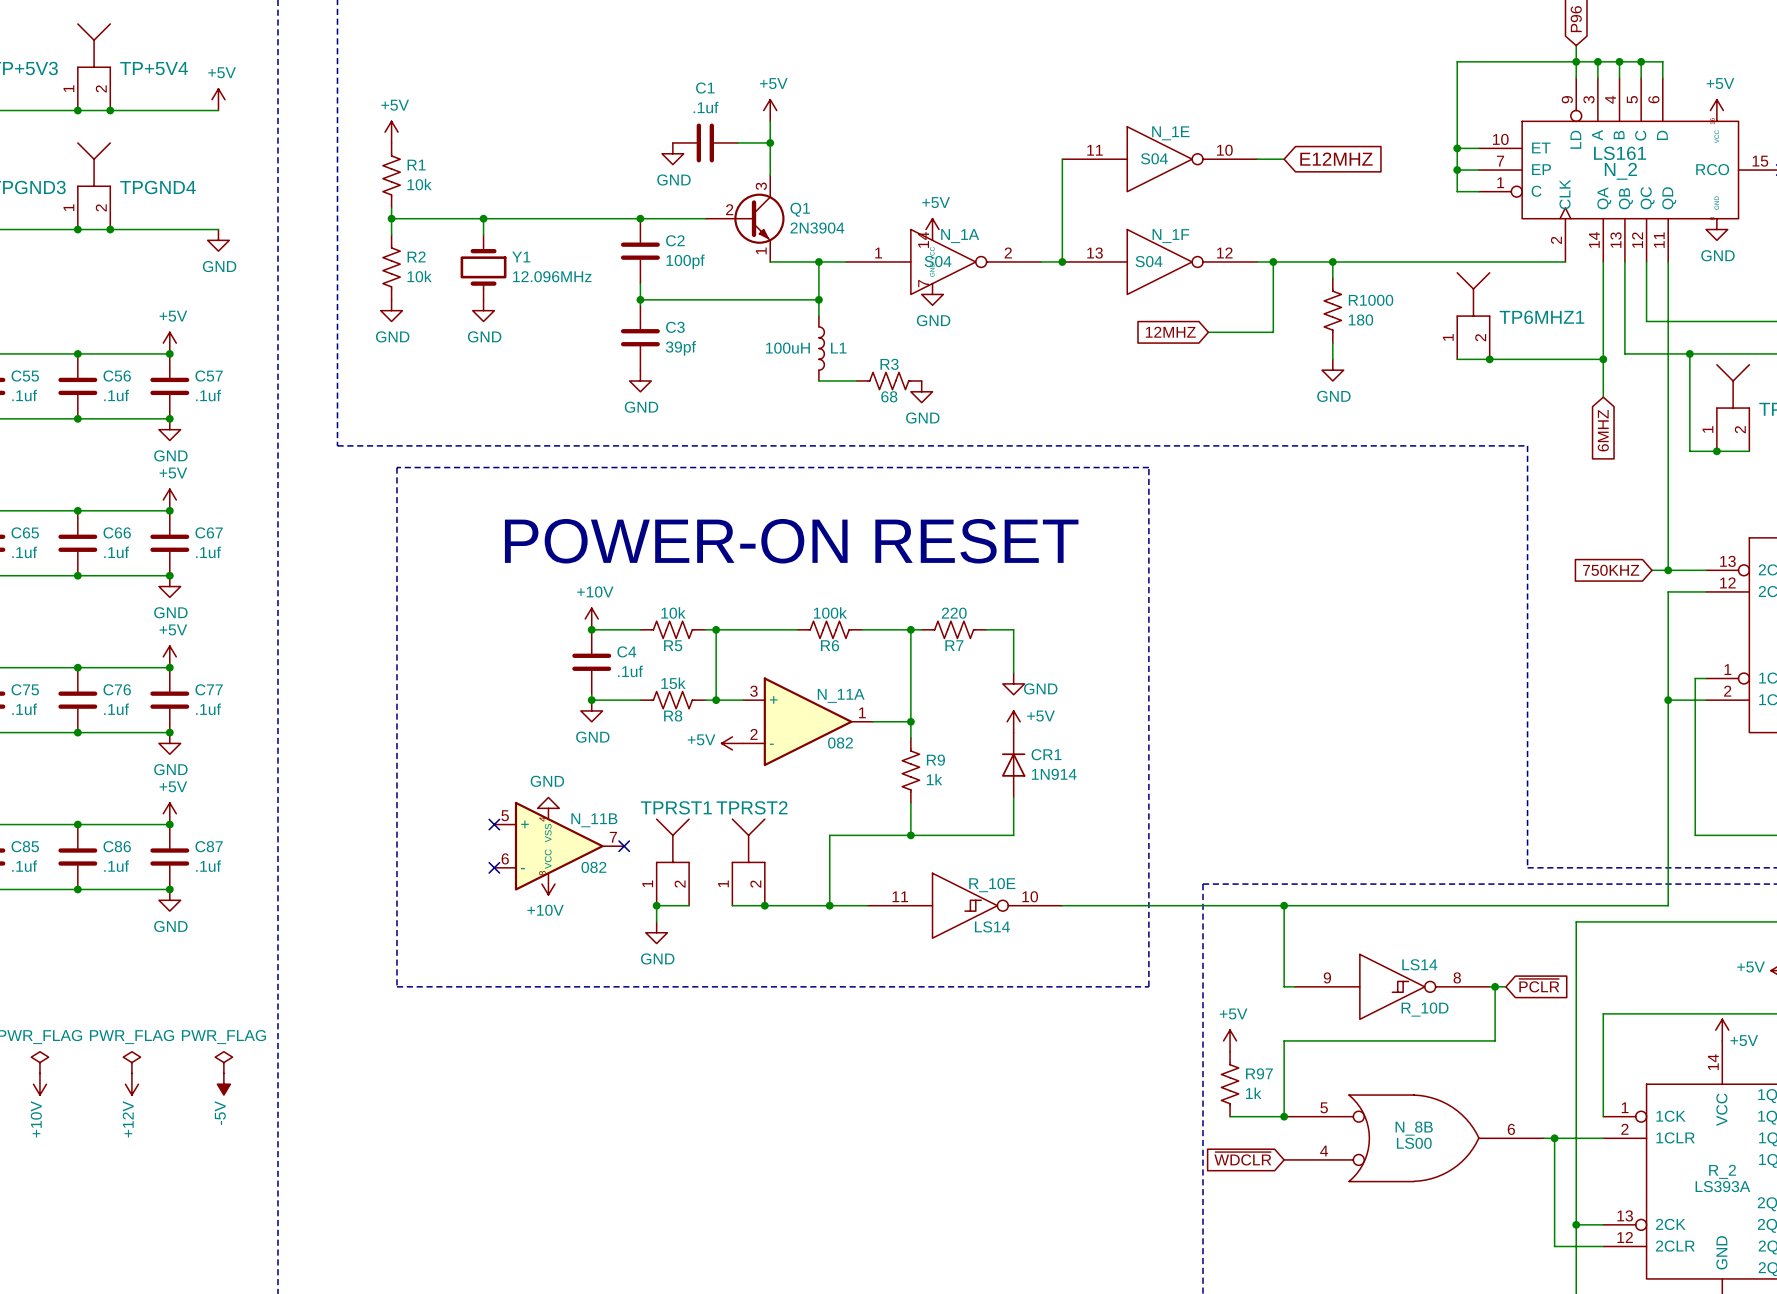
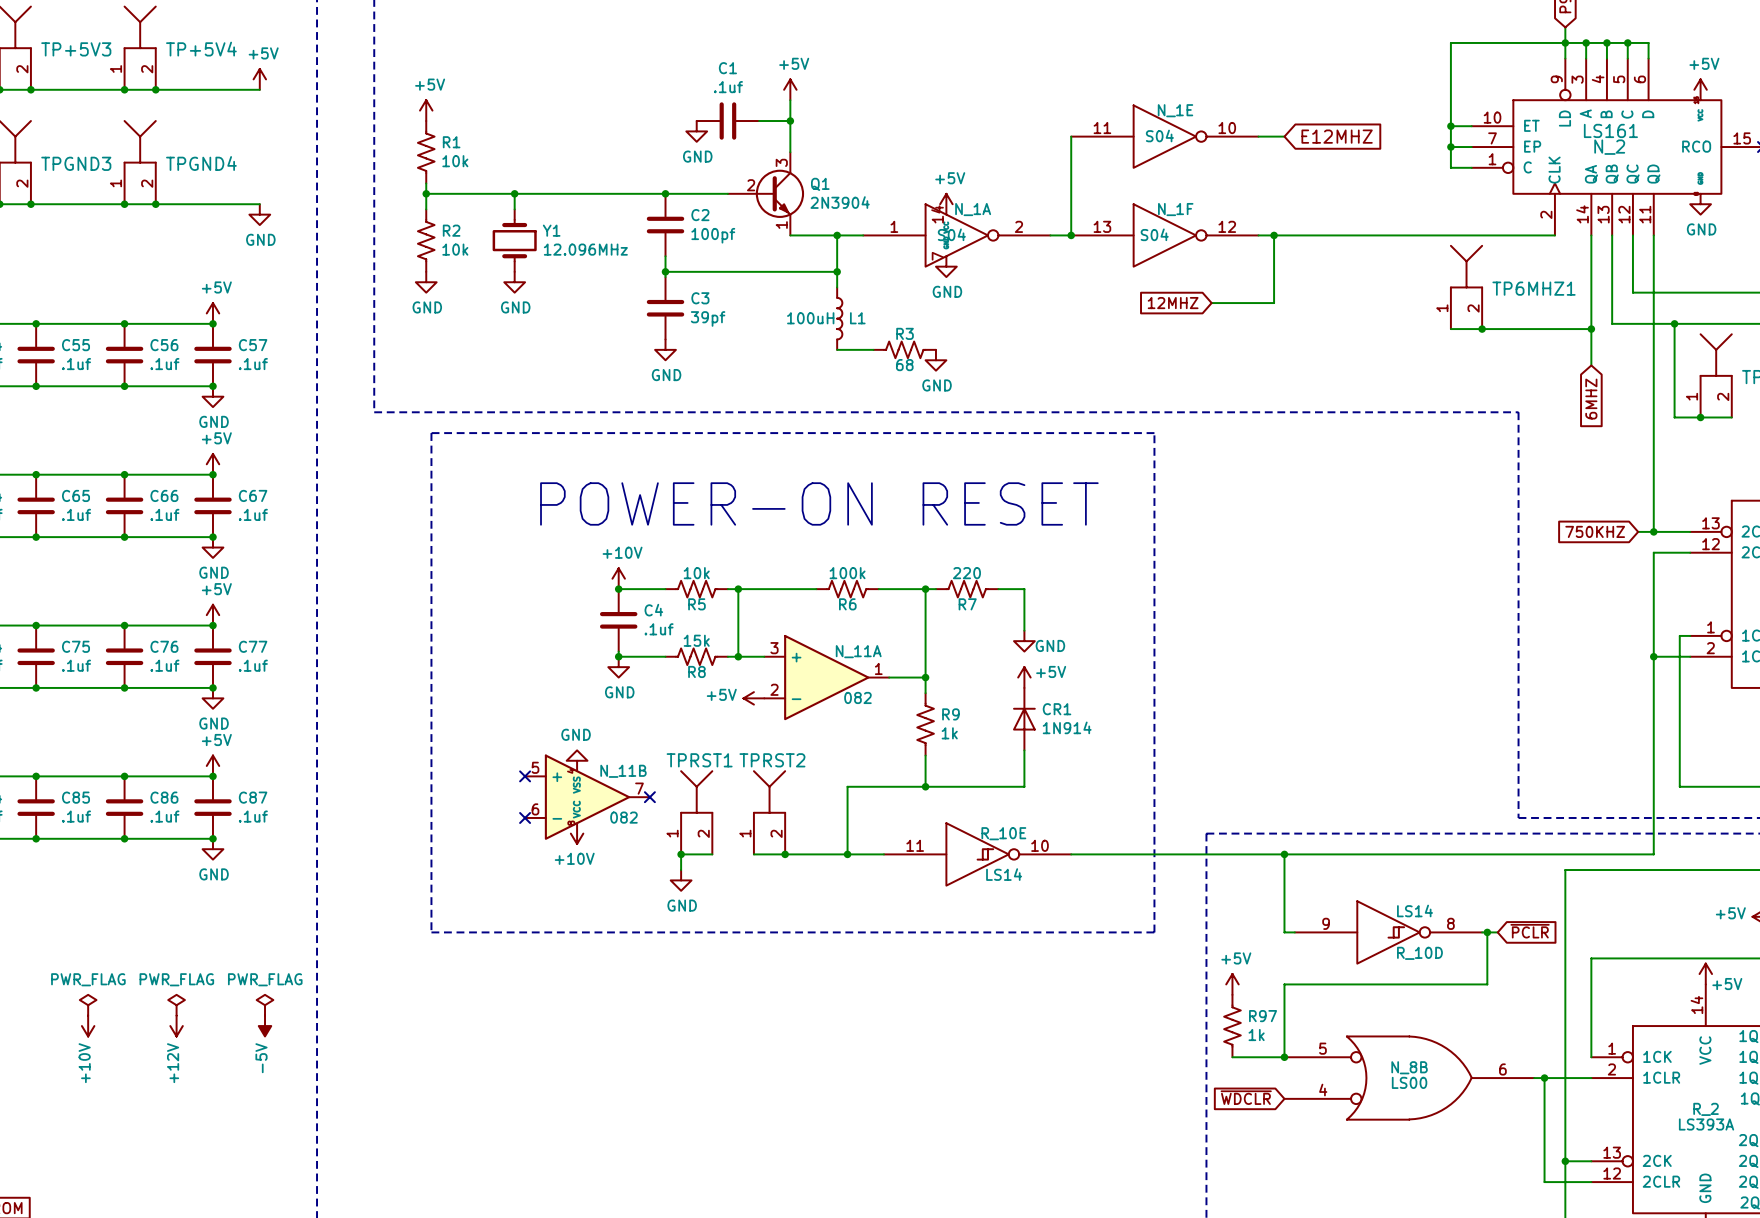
wire: (1332, 261) (1332, 278) -> none
junction: (1332, 261) -> none
R1000: 180 (1332, 310) -> none
wire: (1332, 343) (1332, 359) -> none
power symbol: GND (1332, 370) -> none

